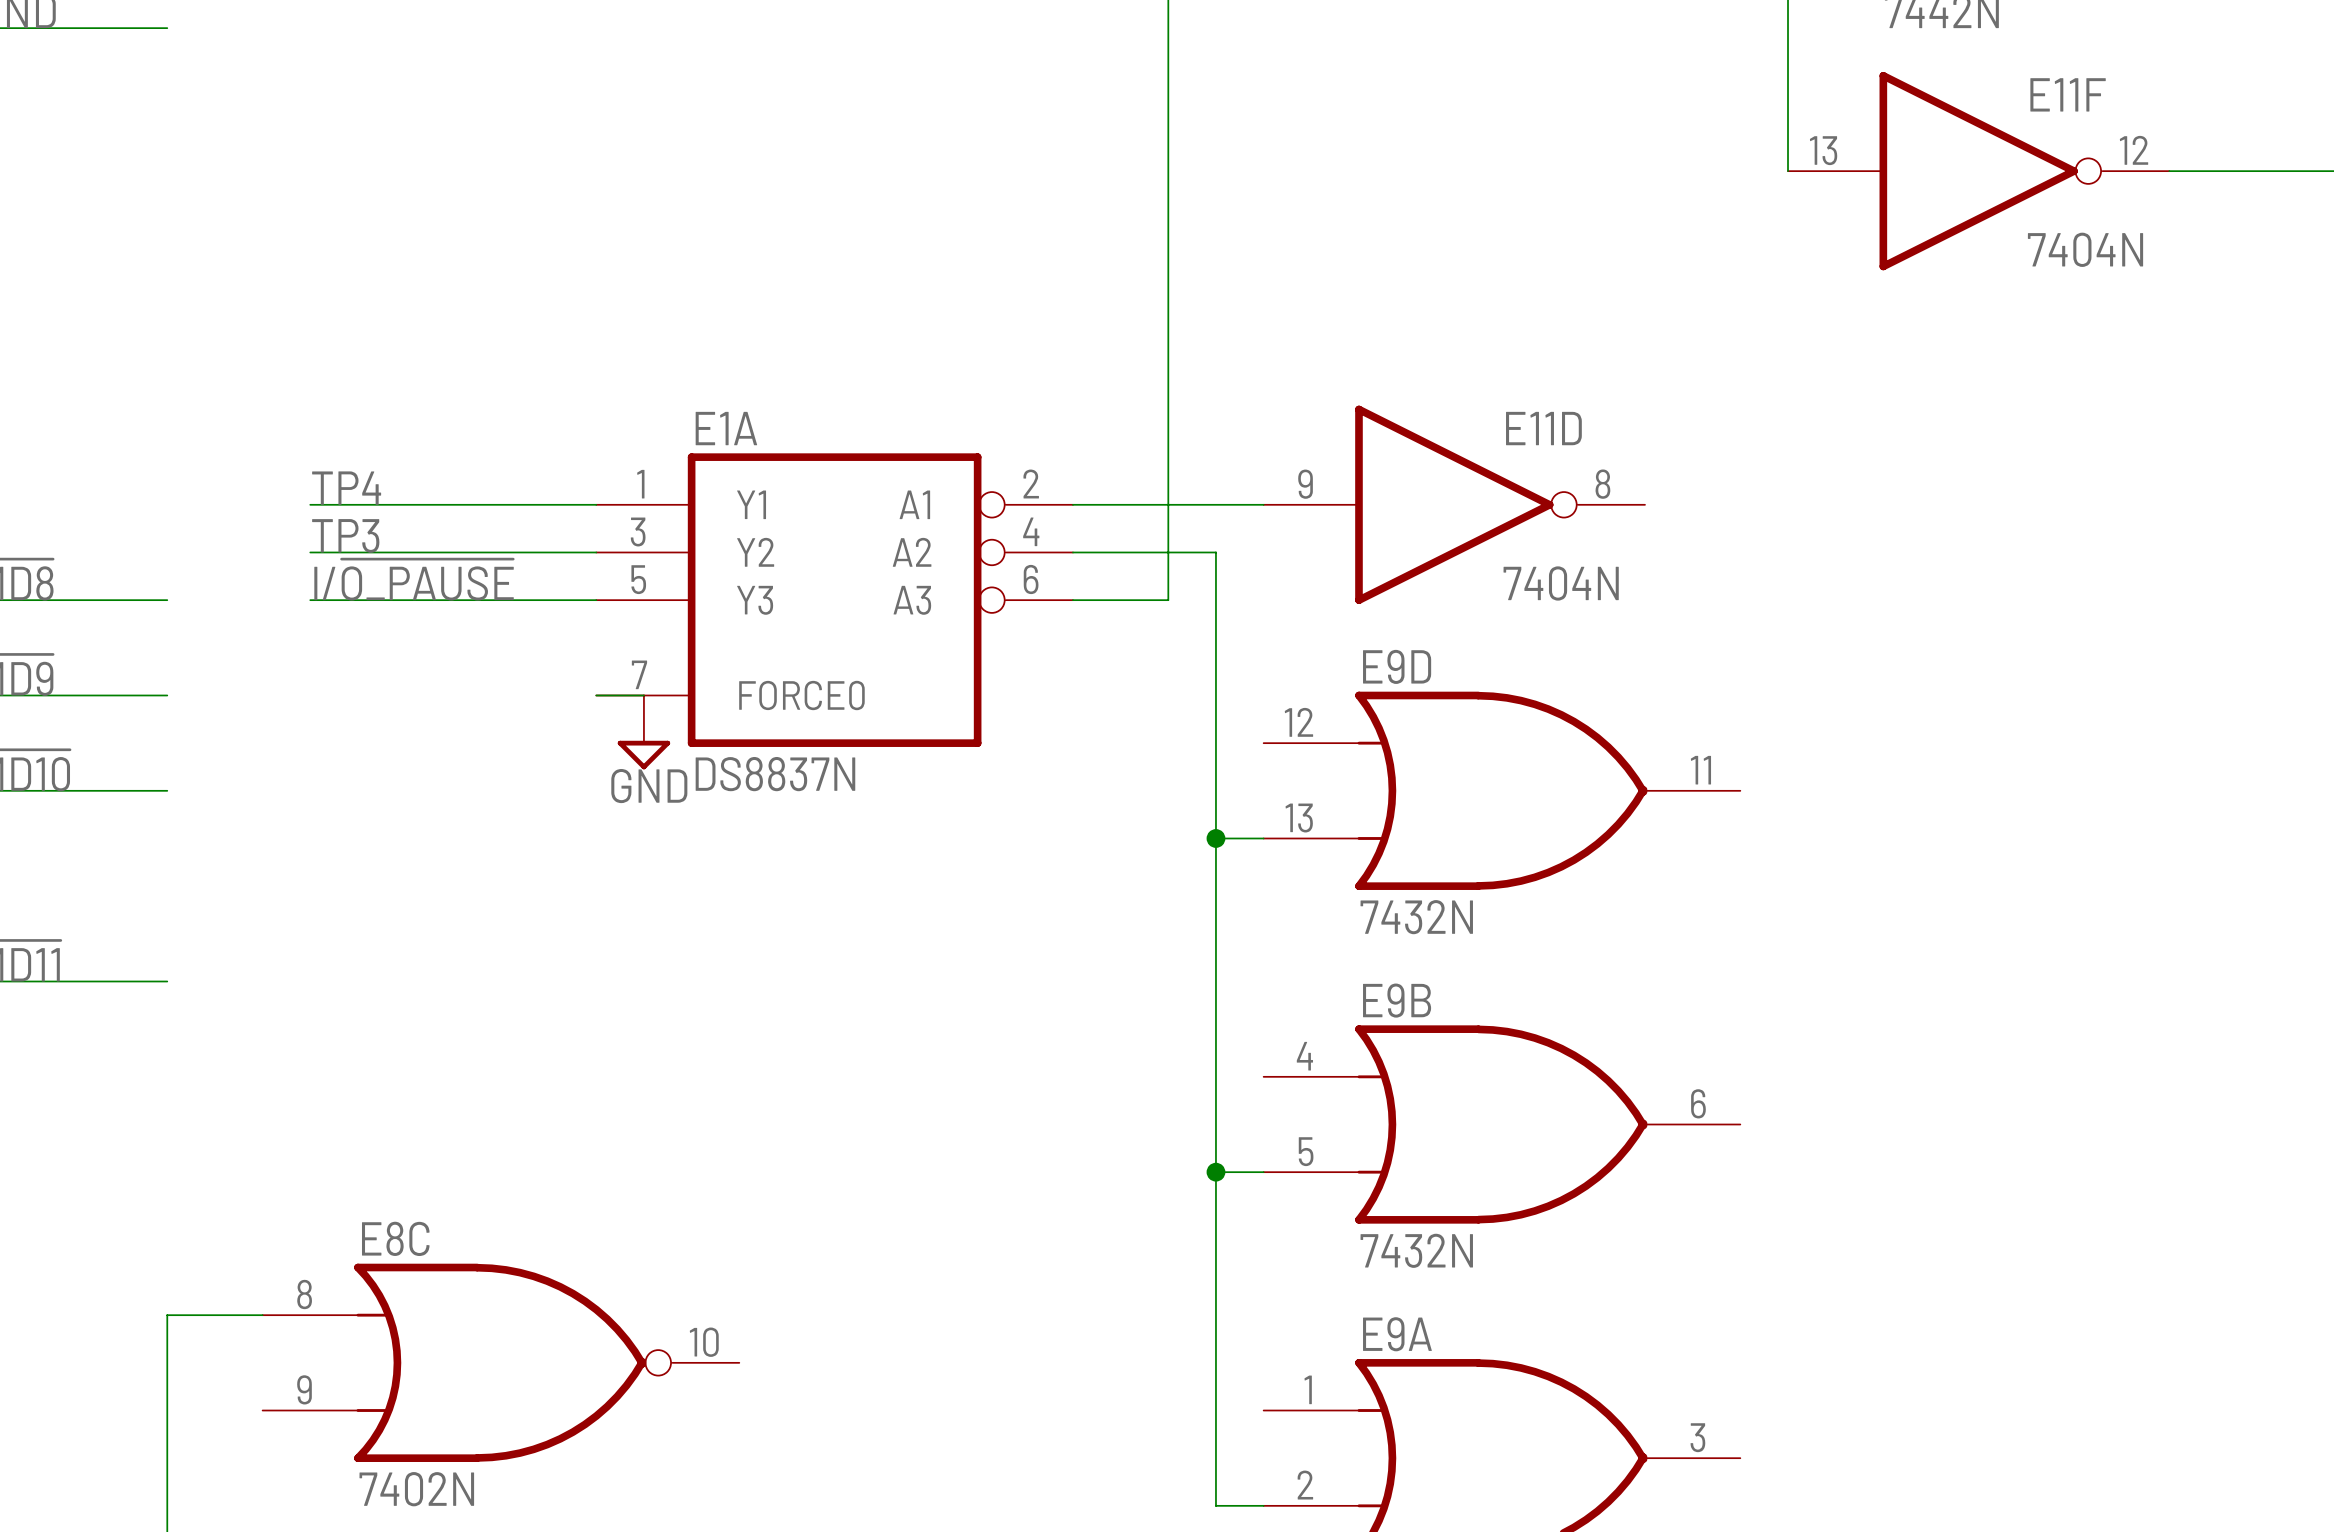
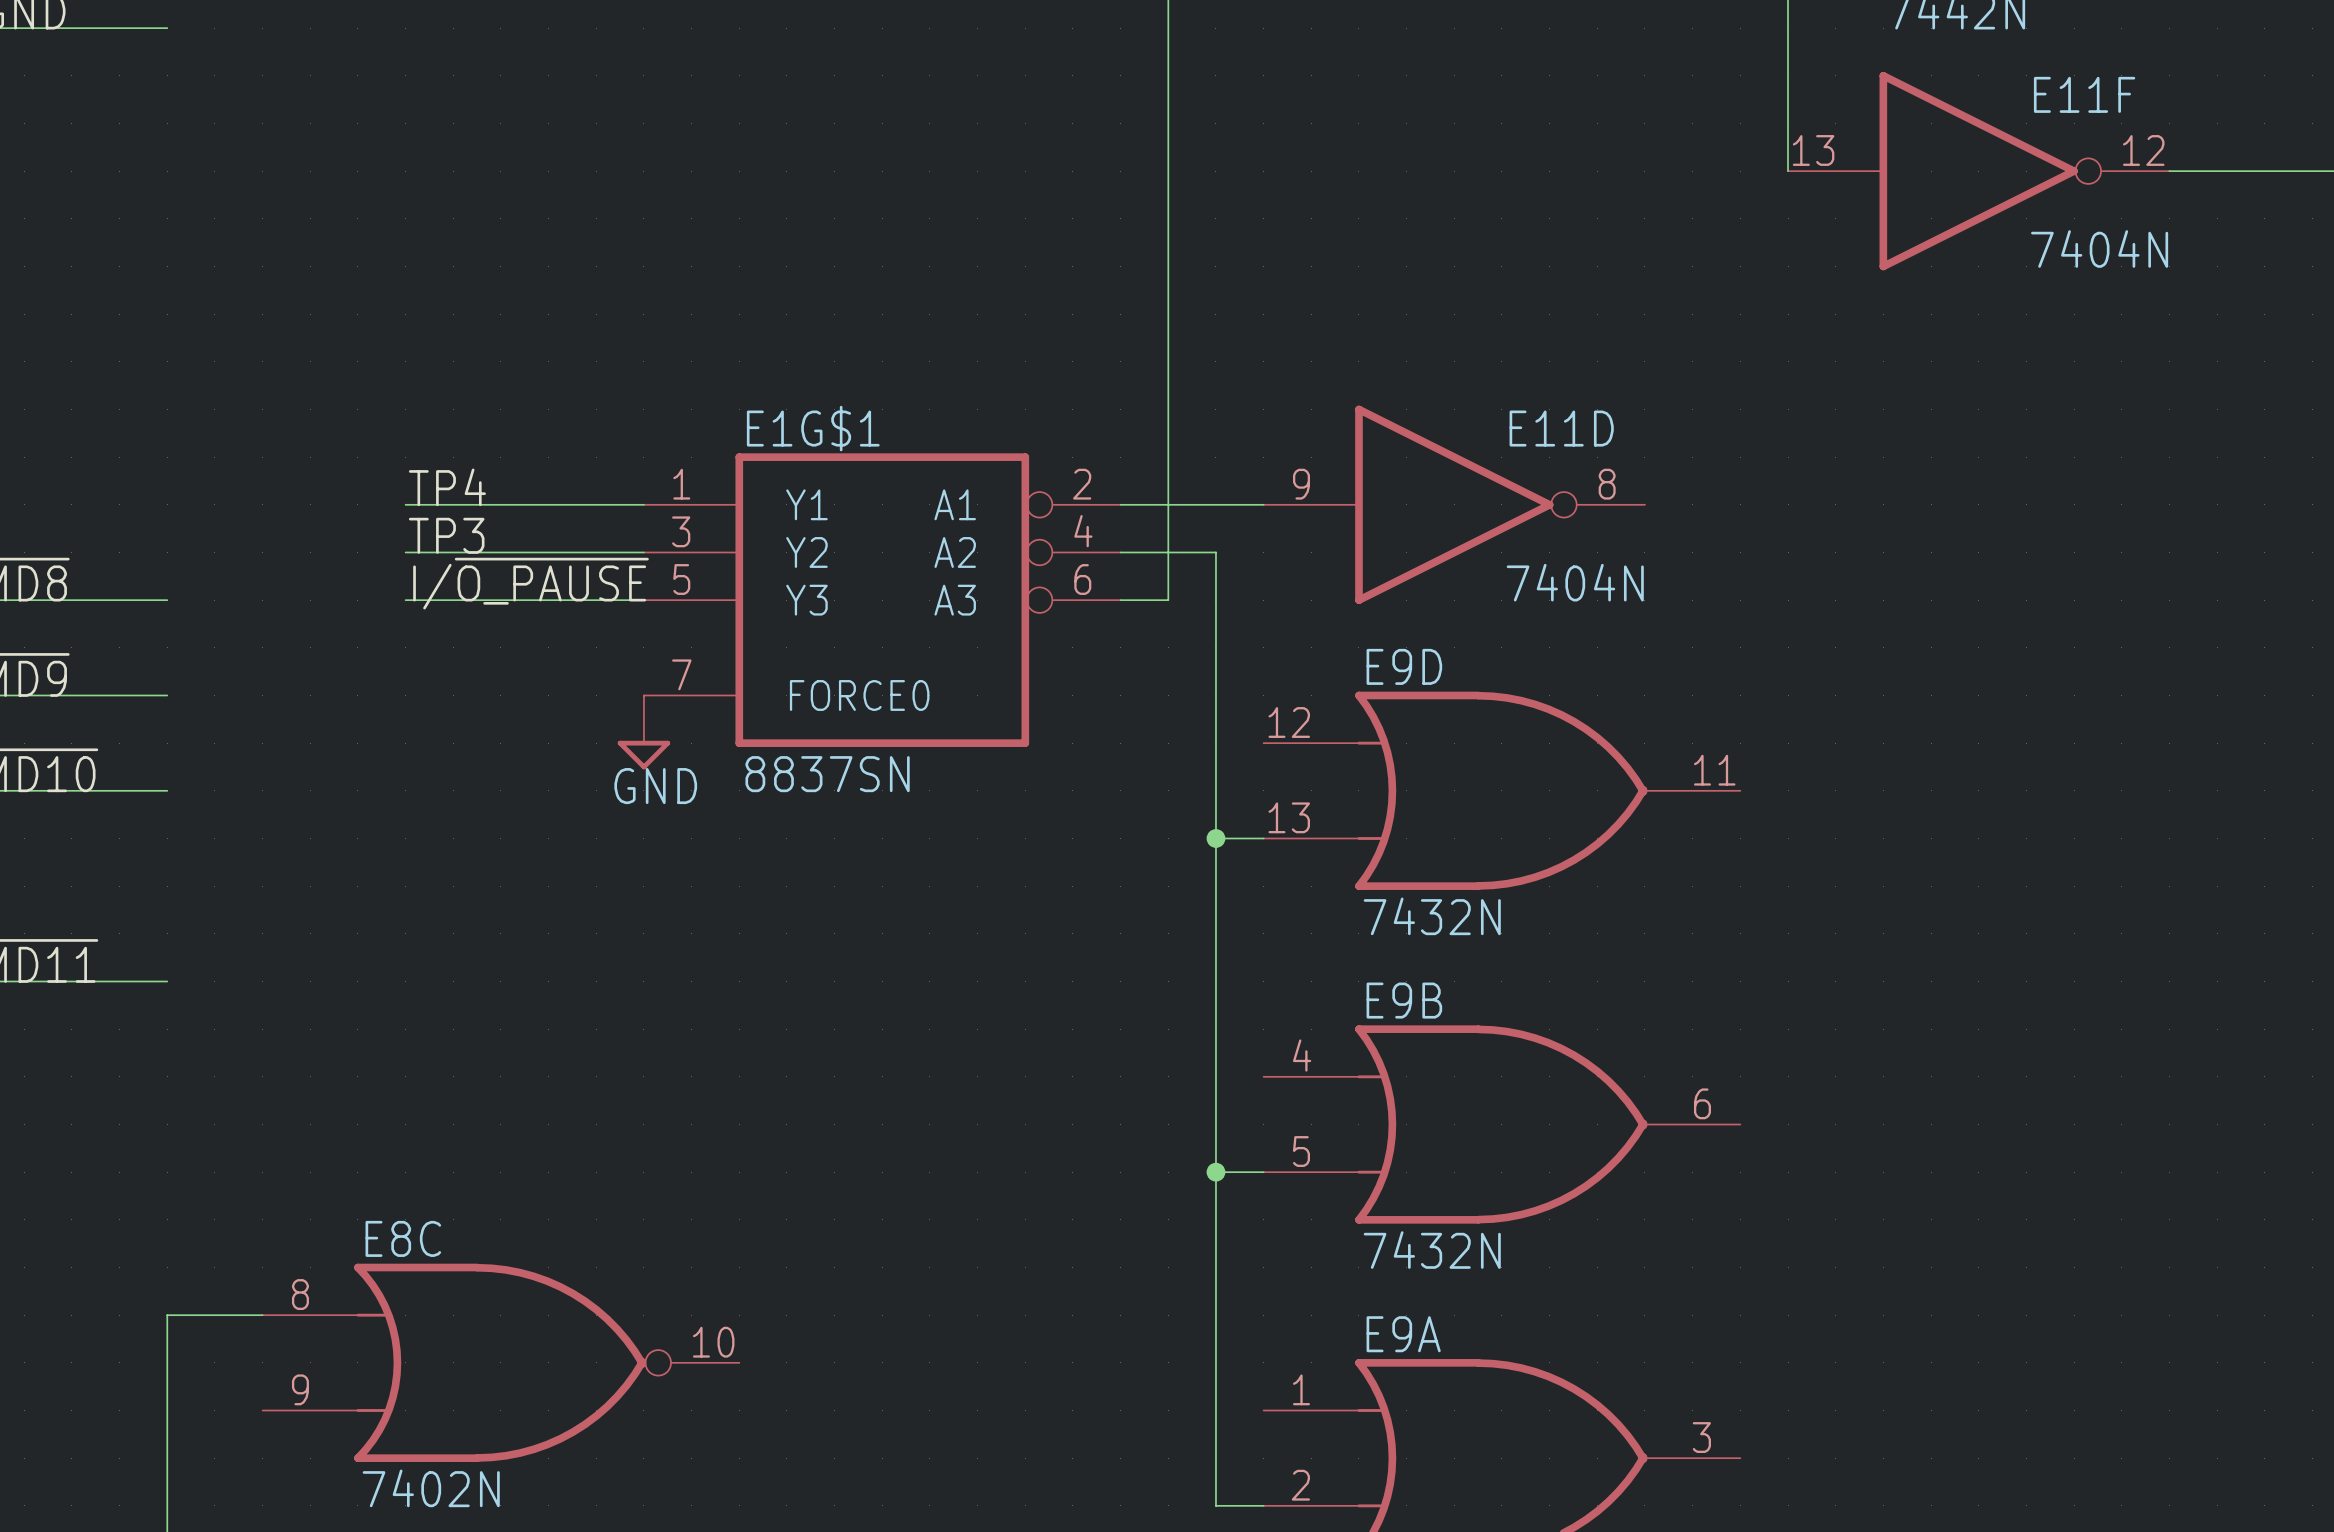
label position: TP4 (346, 488) -> TP4 (447, 487)
wire: (310, 504) (405, 504) -> none
label position: TP3 (345, 535) -> TP3 (446, 535)
wire: (310, 552) (405, 552) -> none
label position: I/~{O_PAUSE} (414, 579) -> I/~{O_PAUSE} (531, 583)
wire: (310, 600) (405, 600) -> none
E1A: DS8837N (834, 600) -> none
E1G$1: none -> 8837SN (882, 600)

